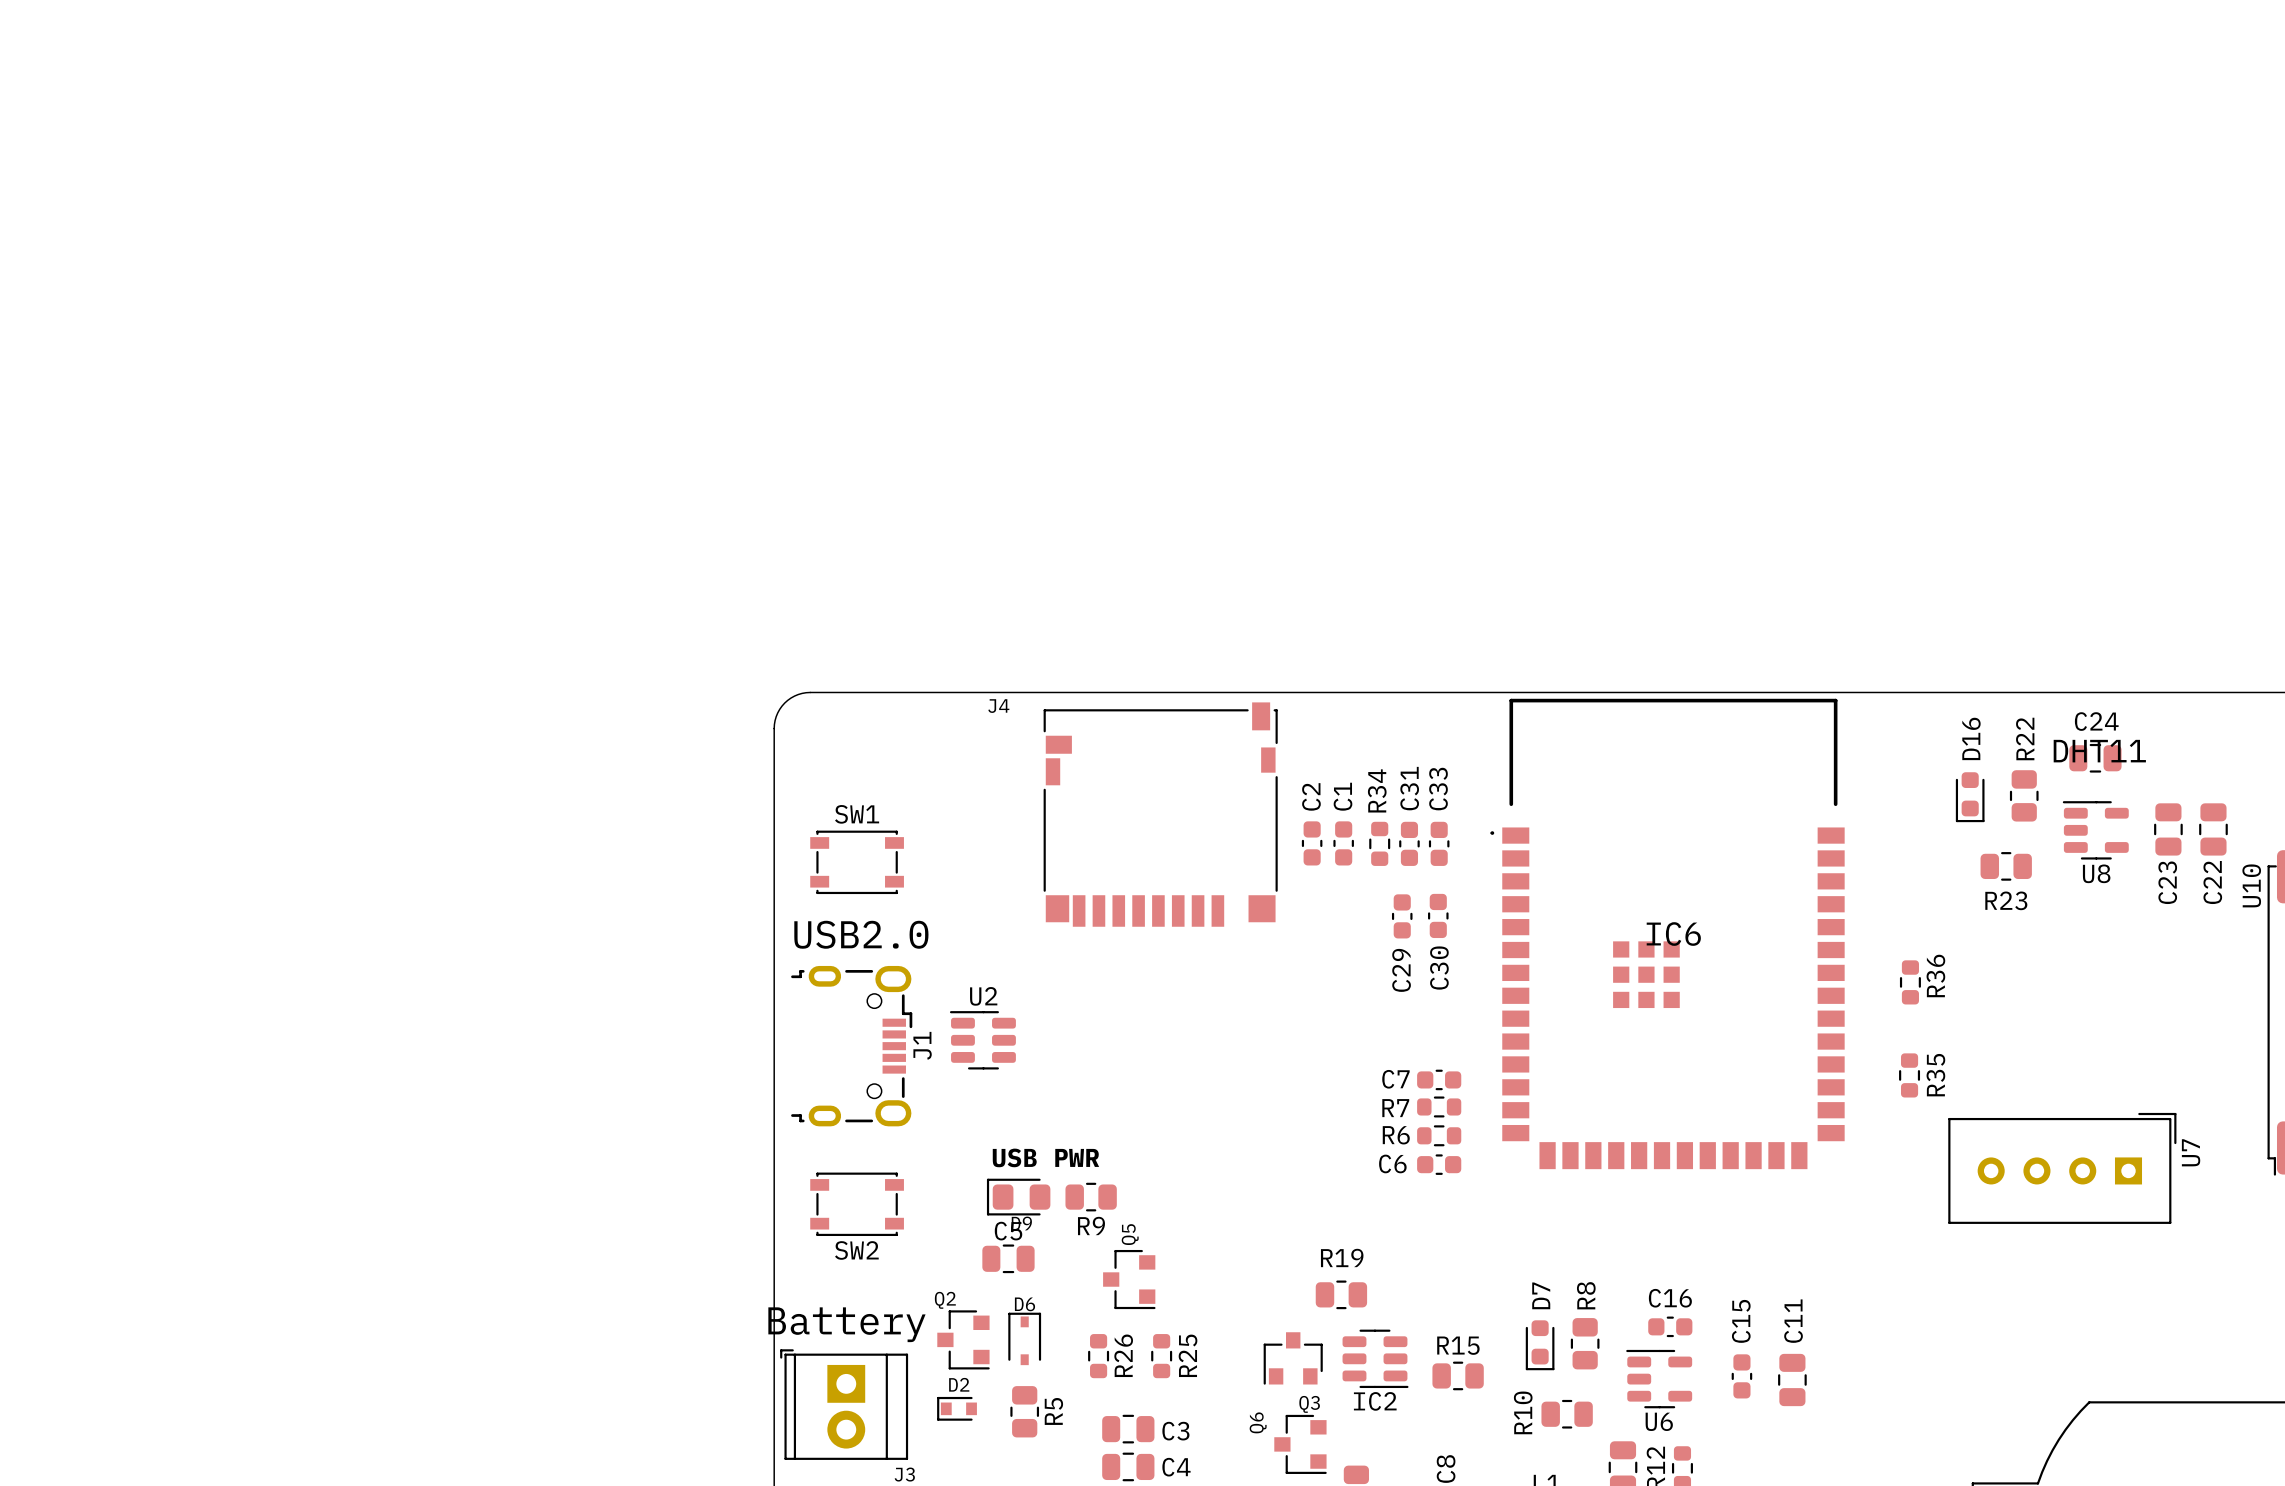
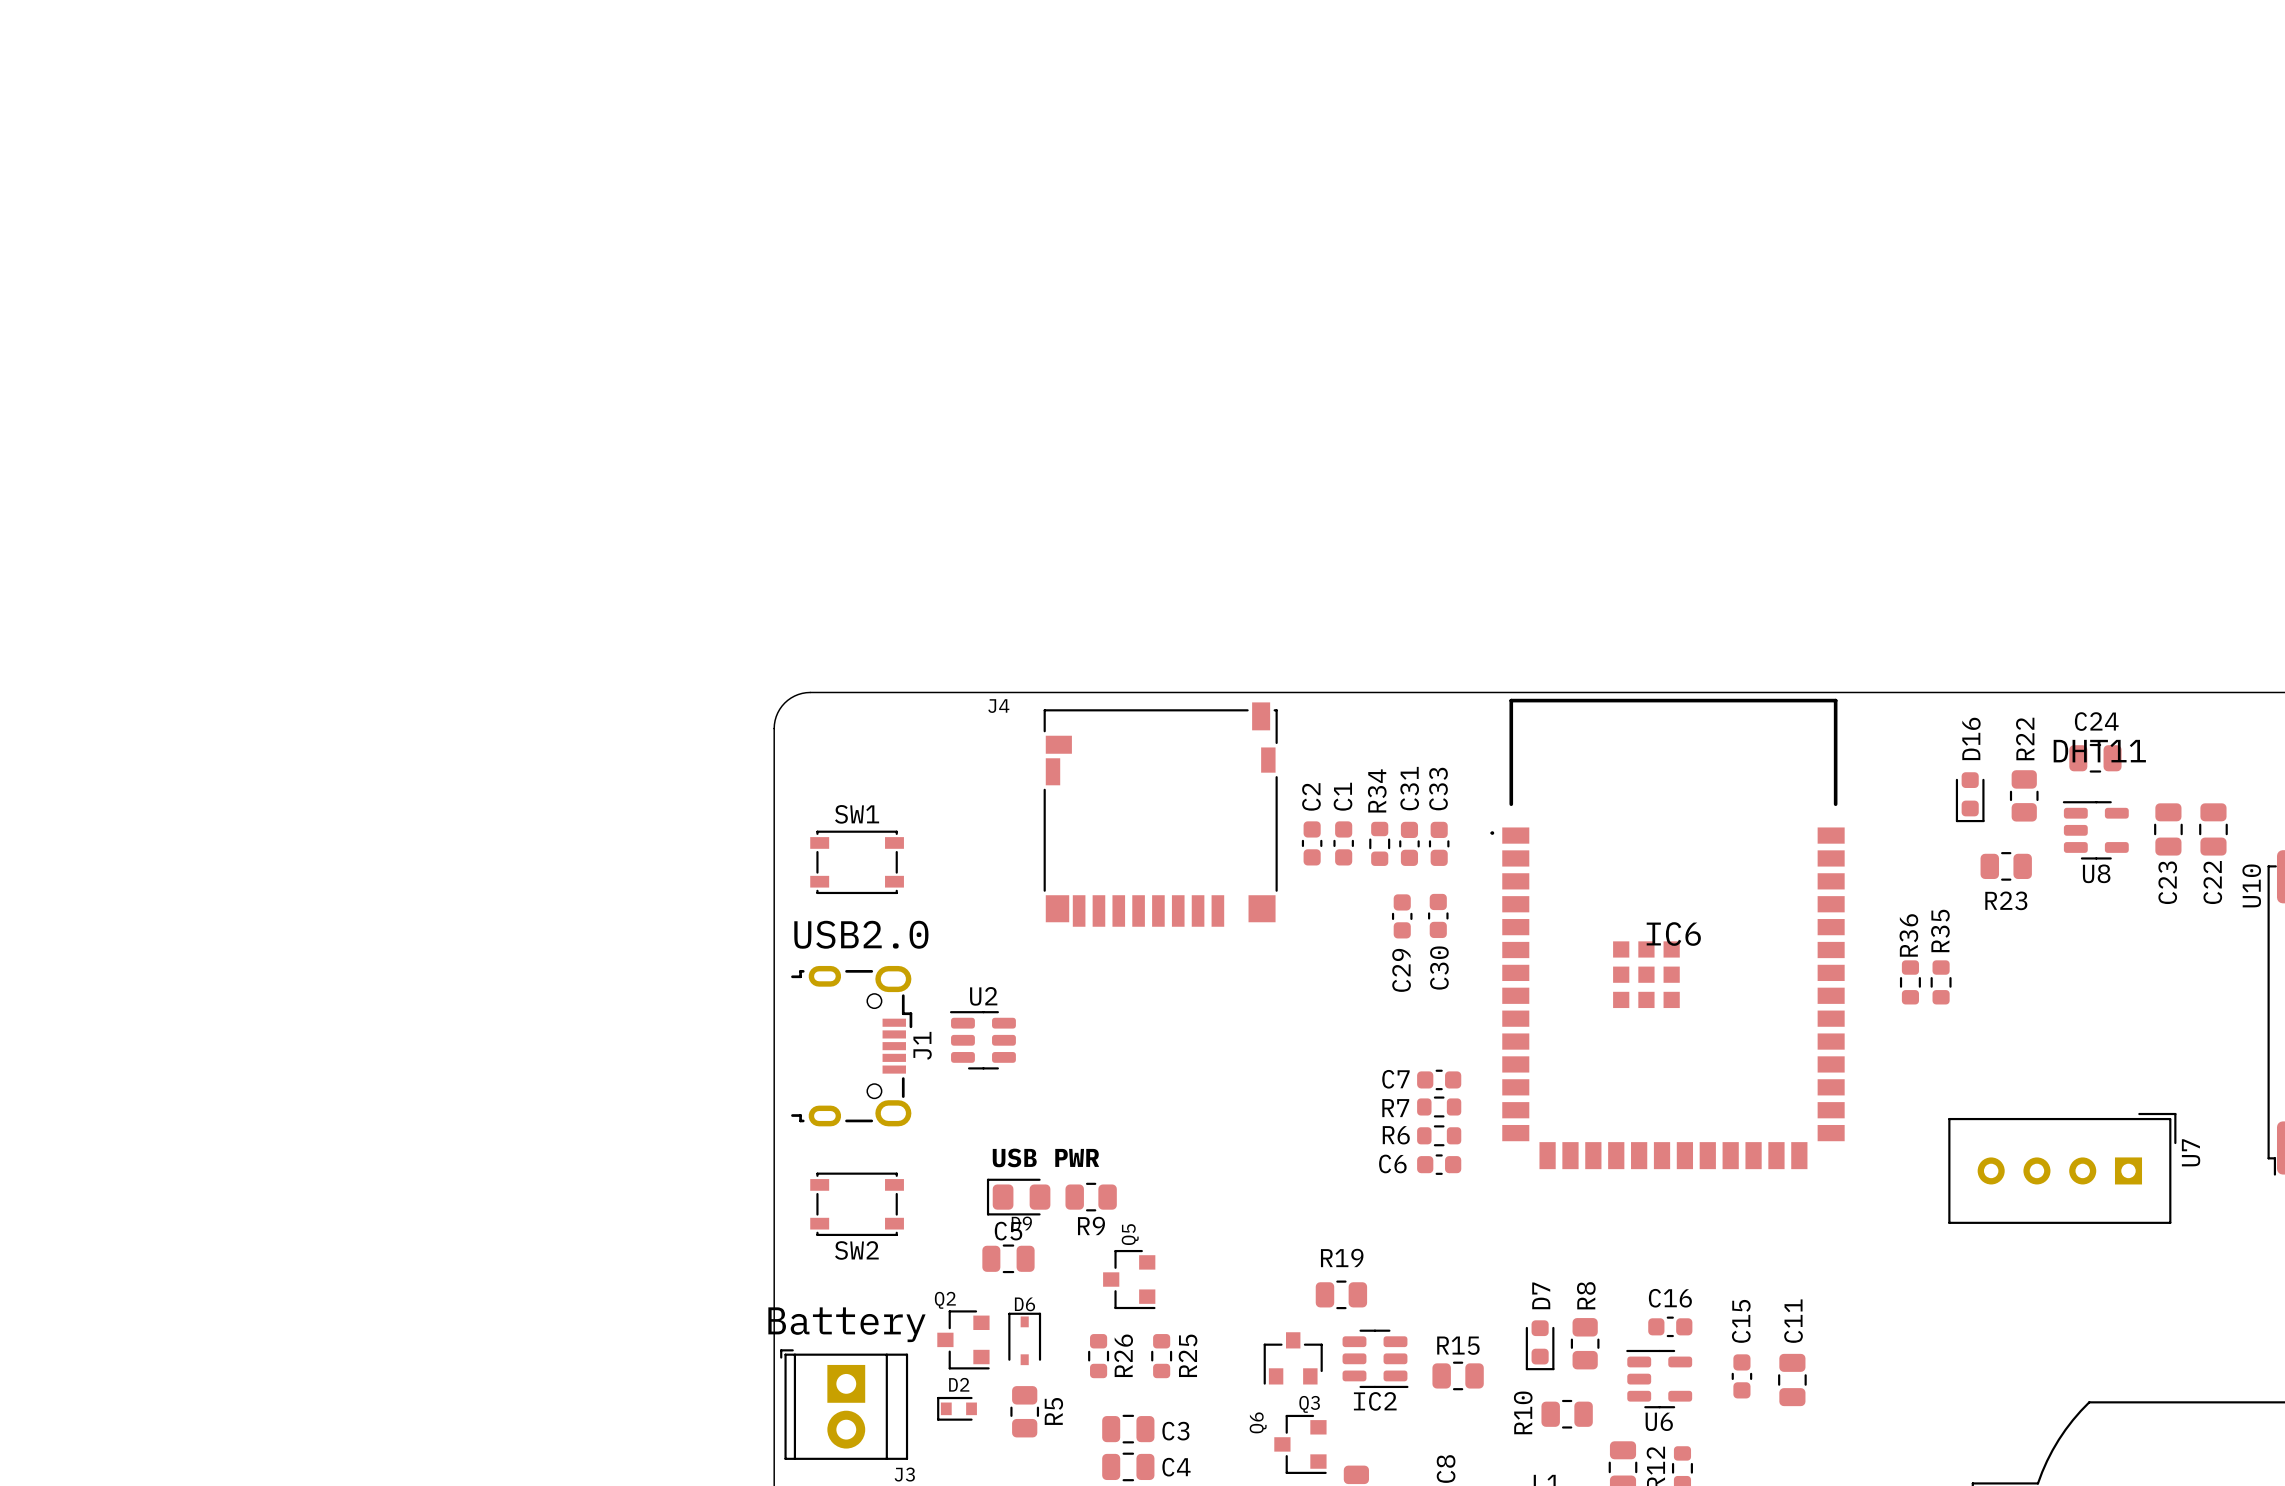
R36 name position: R36 (1935, 975) -> R36 (1908, 935)
R35 position: (1909, 1075) -> (1941, 982)
R35 name position: R35 (1935, 1075) -> R35 (1940, 930)

